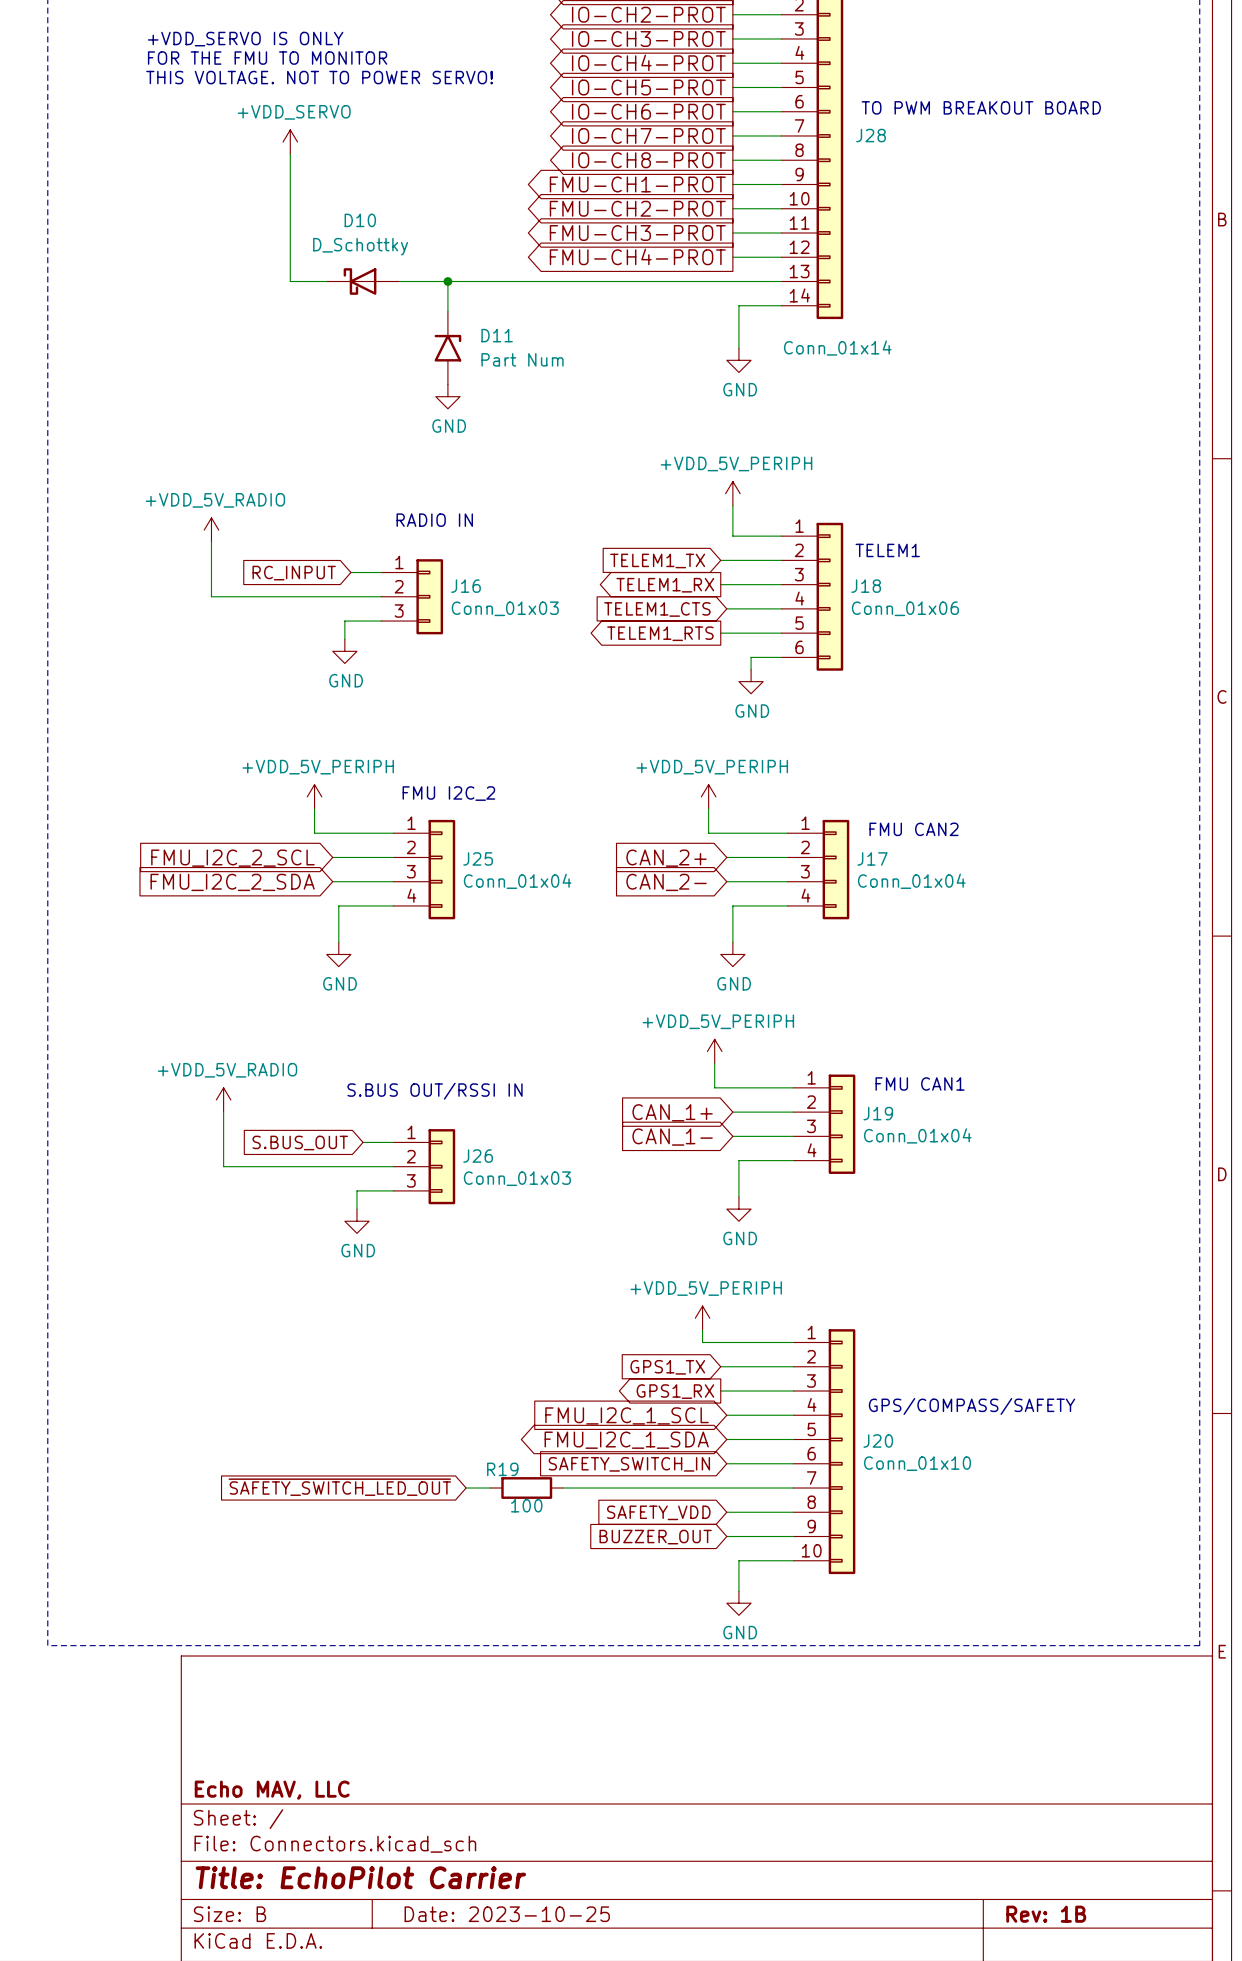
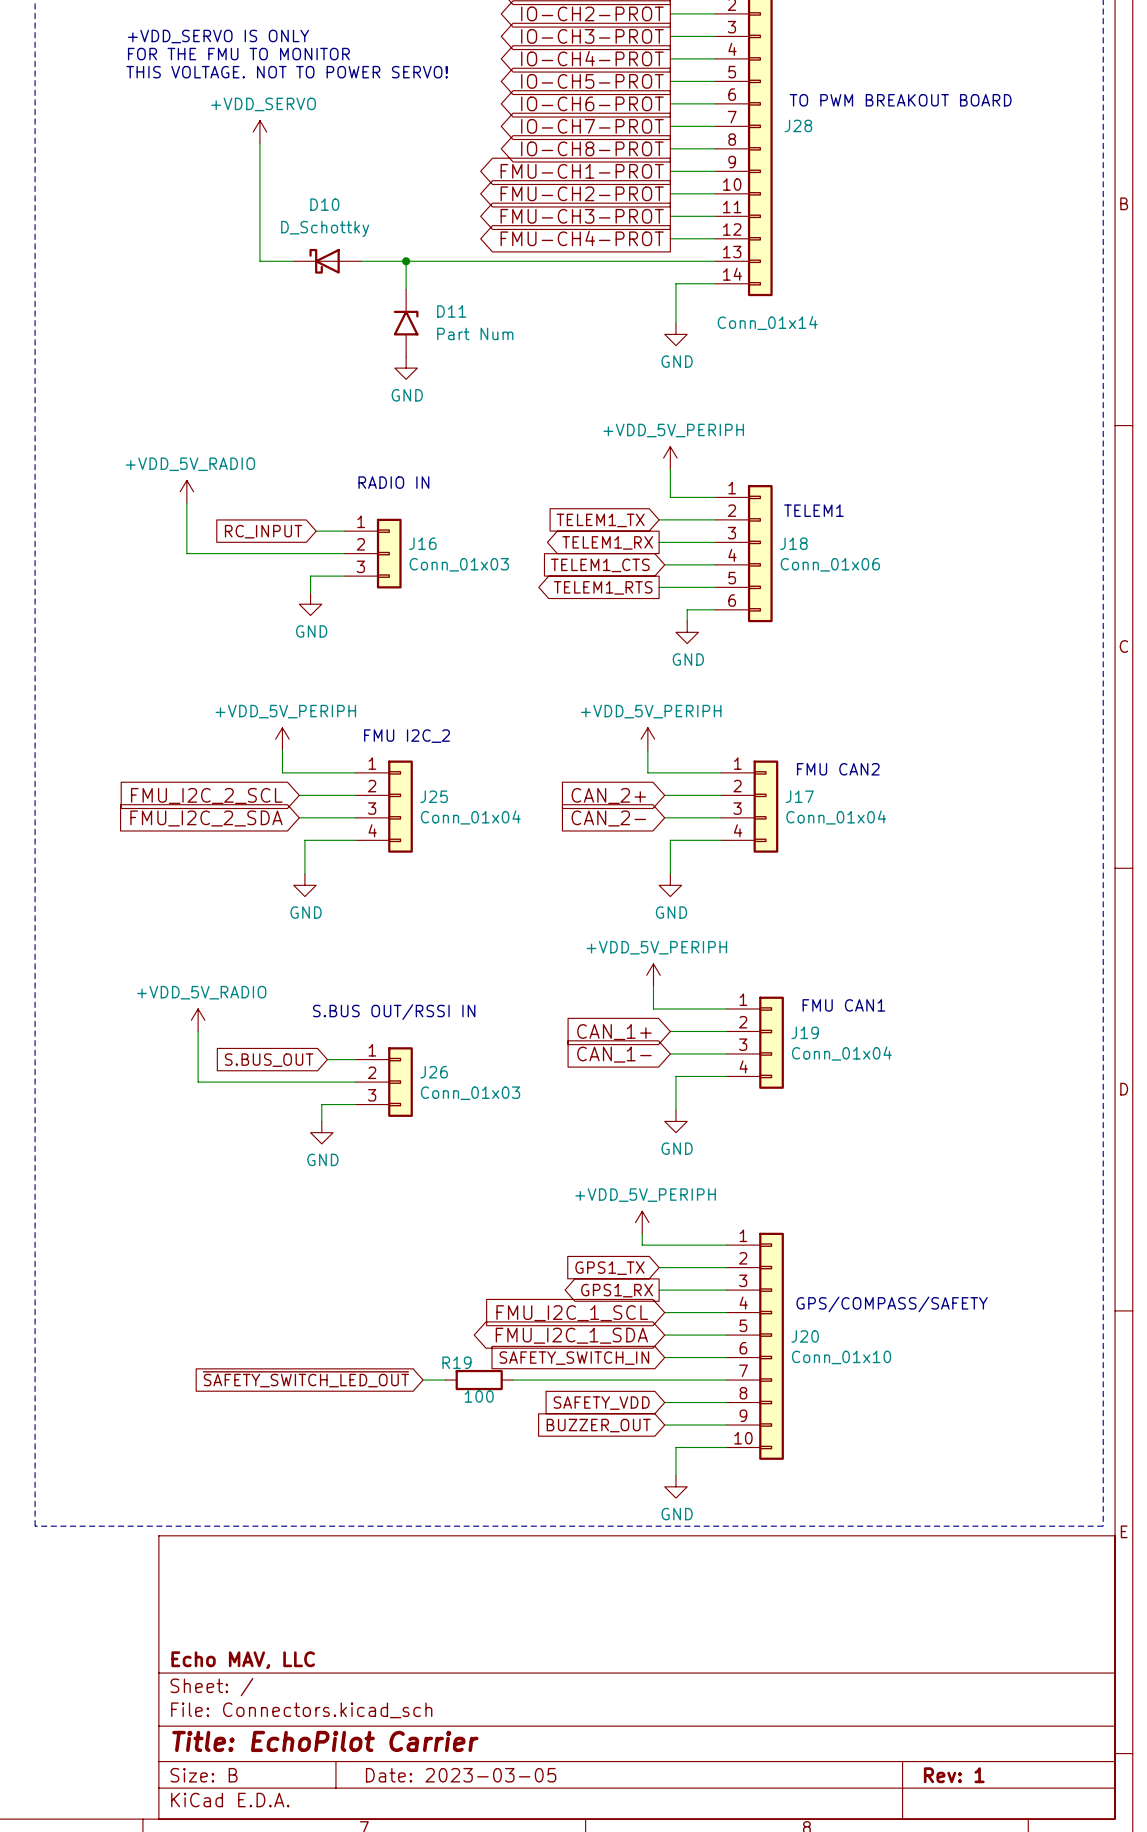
title block: Date: 2023-10-25 (507, 1914) -> Date: 2023-03-05 (461, 1775)
title block: Rev: 1B (1046, 1914) -> Rev: 1 (954, 1775)

